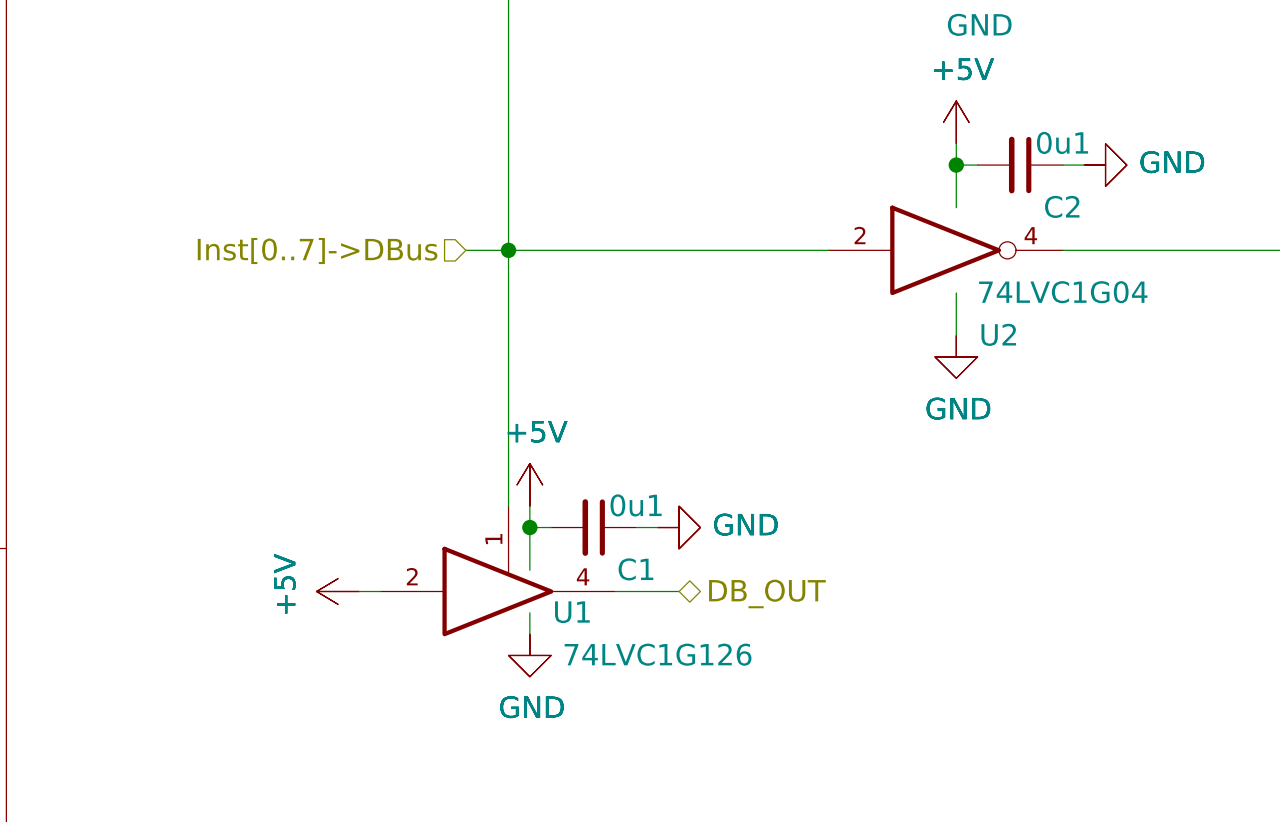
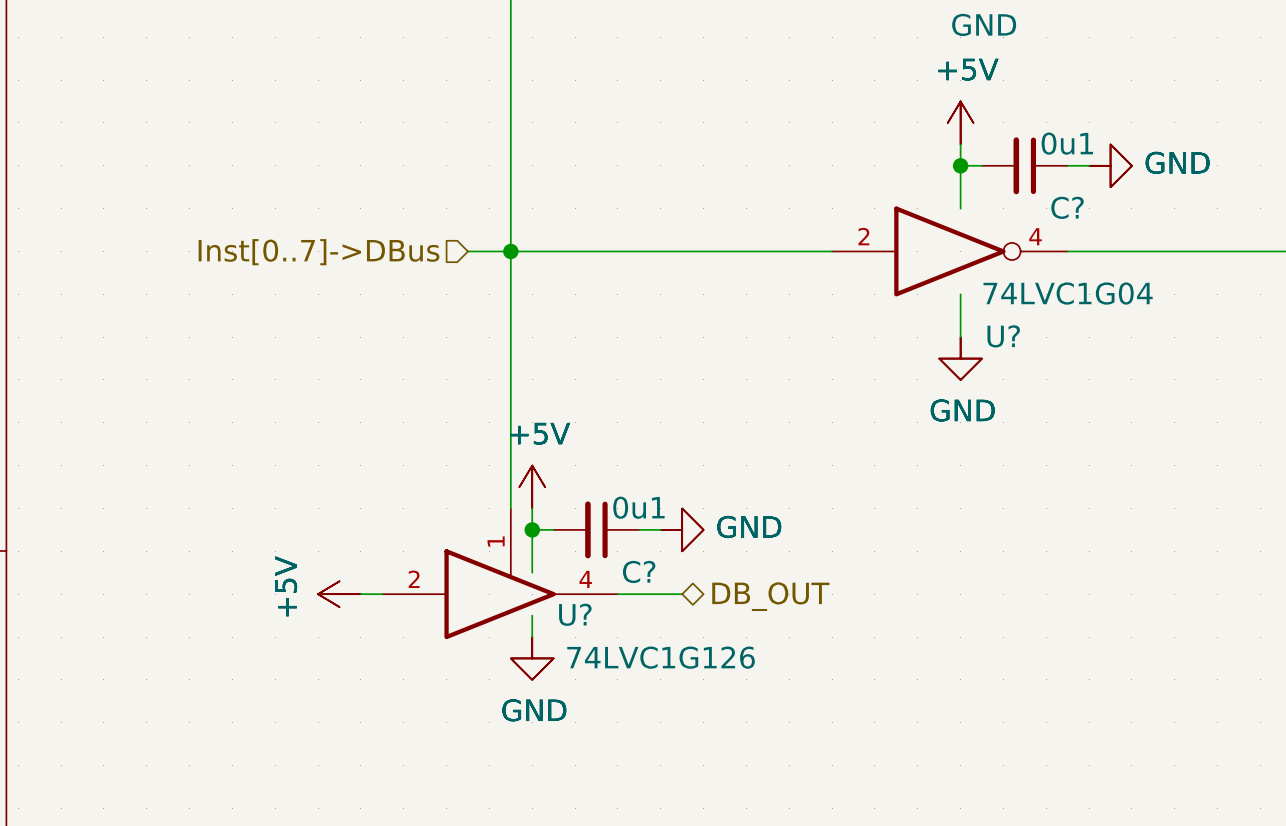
C2 name: C2 (1062, 206) -> C? (1067, 207)
U2 name: U2 (998, 334) -> U? (1003, 336)
C1 name: C1 (635, 569) -> C? (639, 571)
U1 name: U1 (572, 612) -> U? (575, 614)

